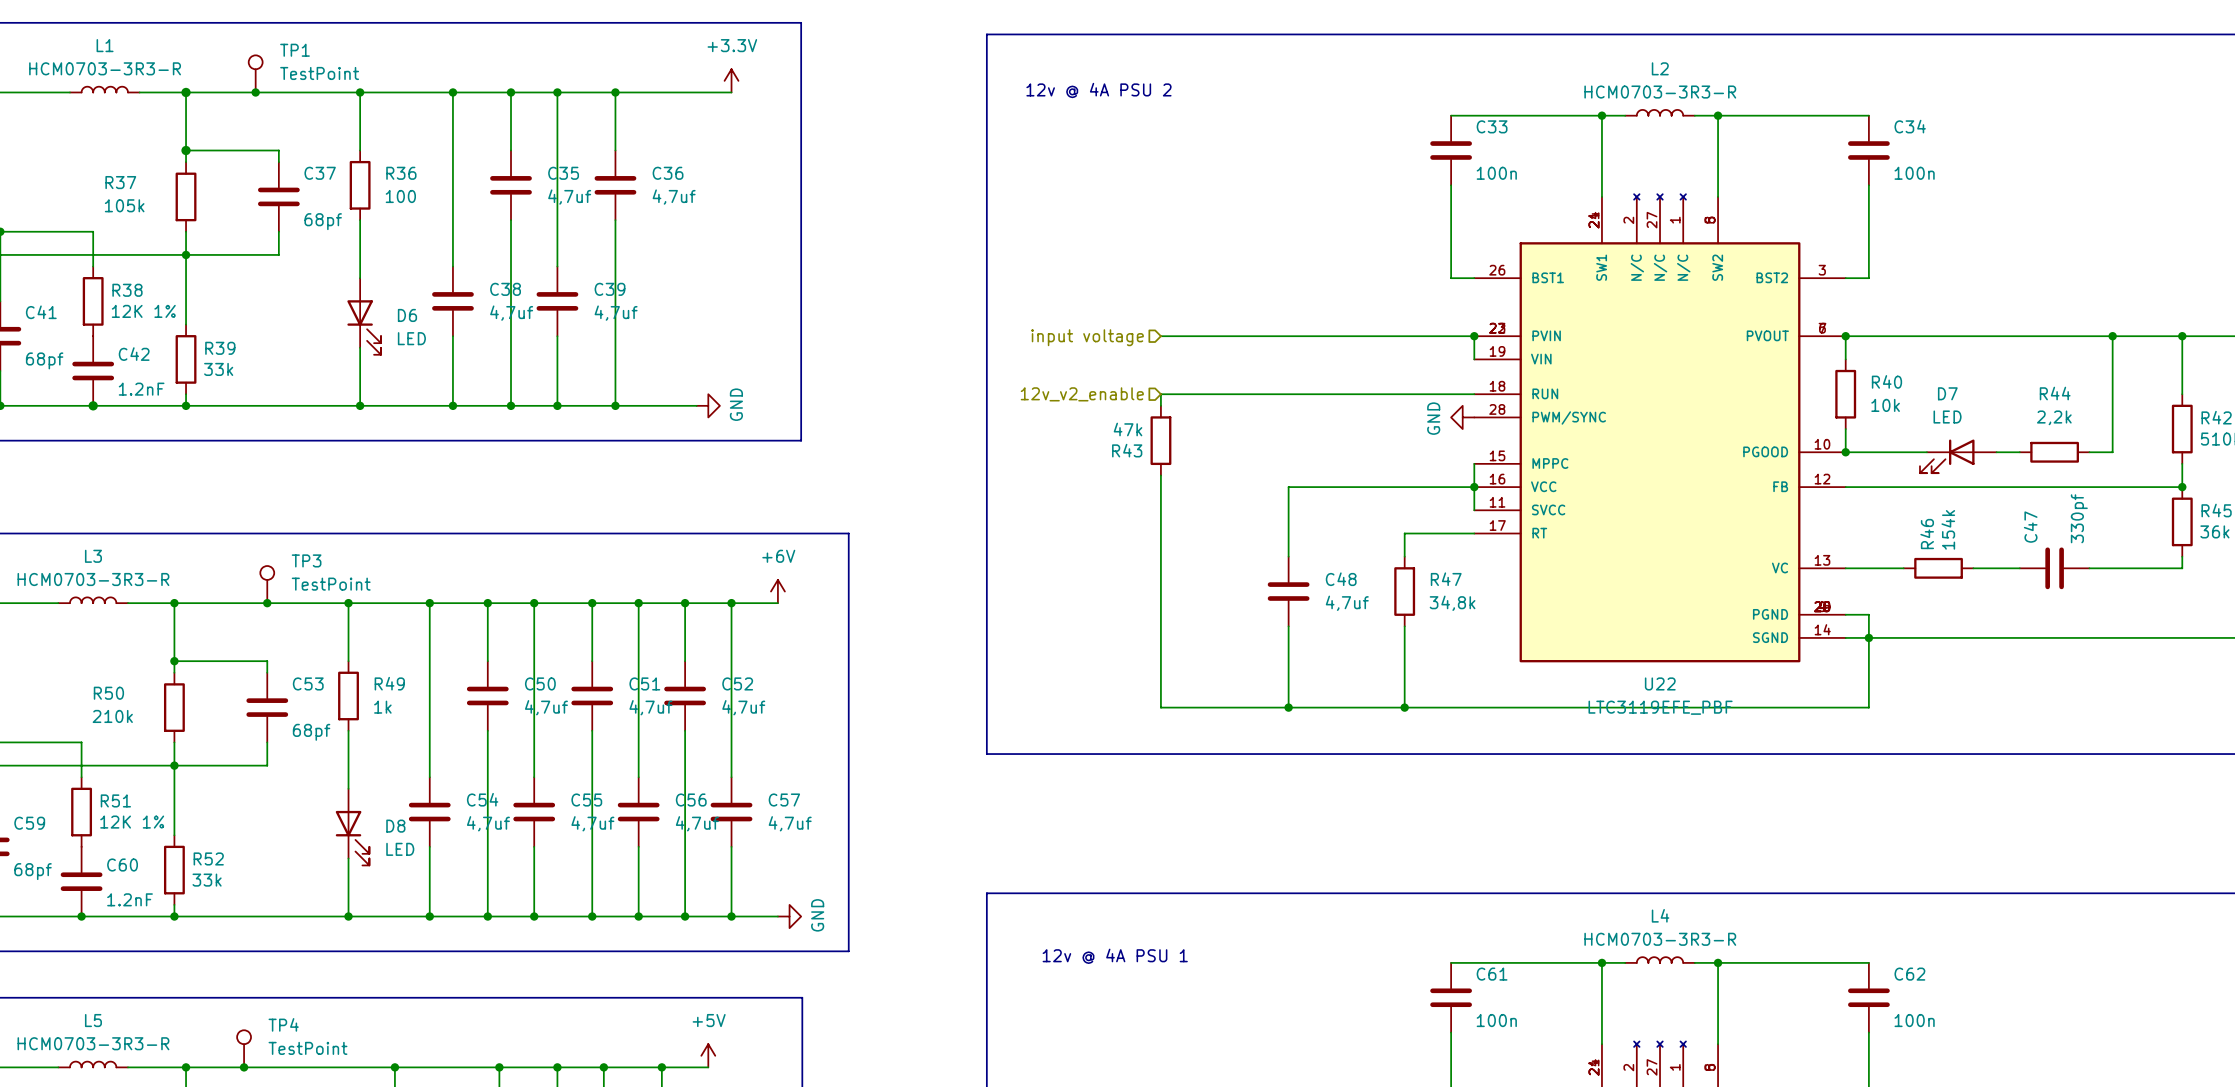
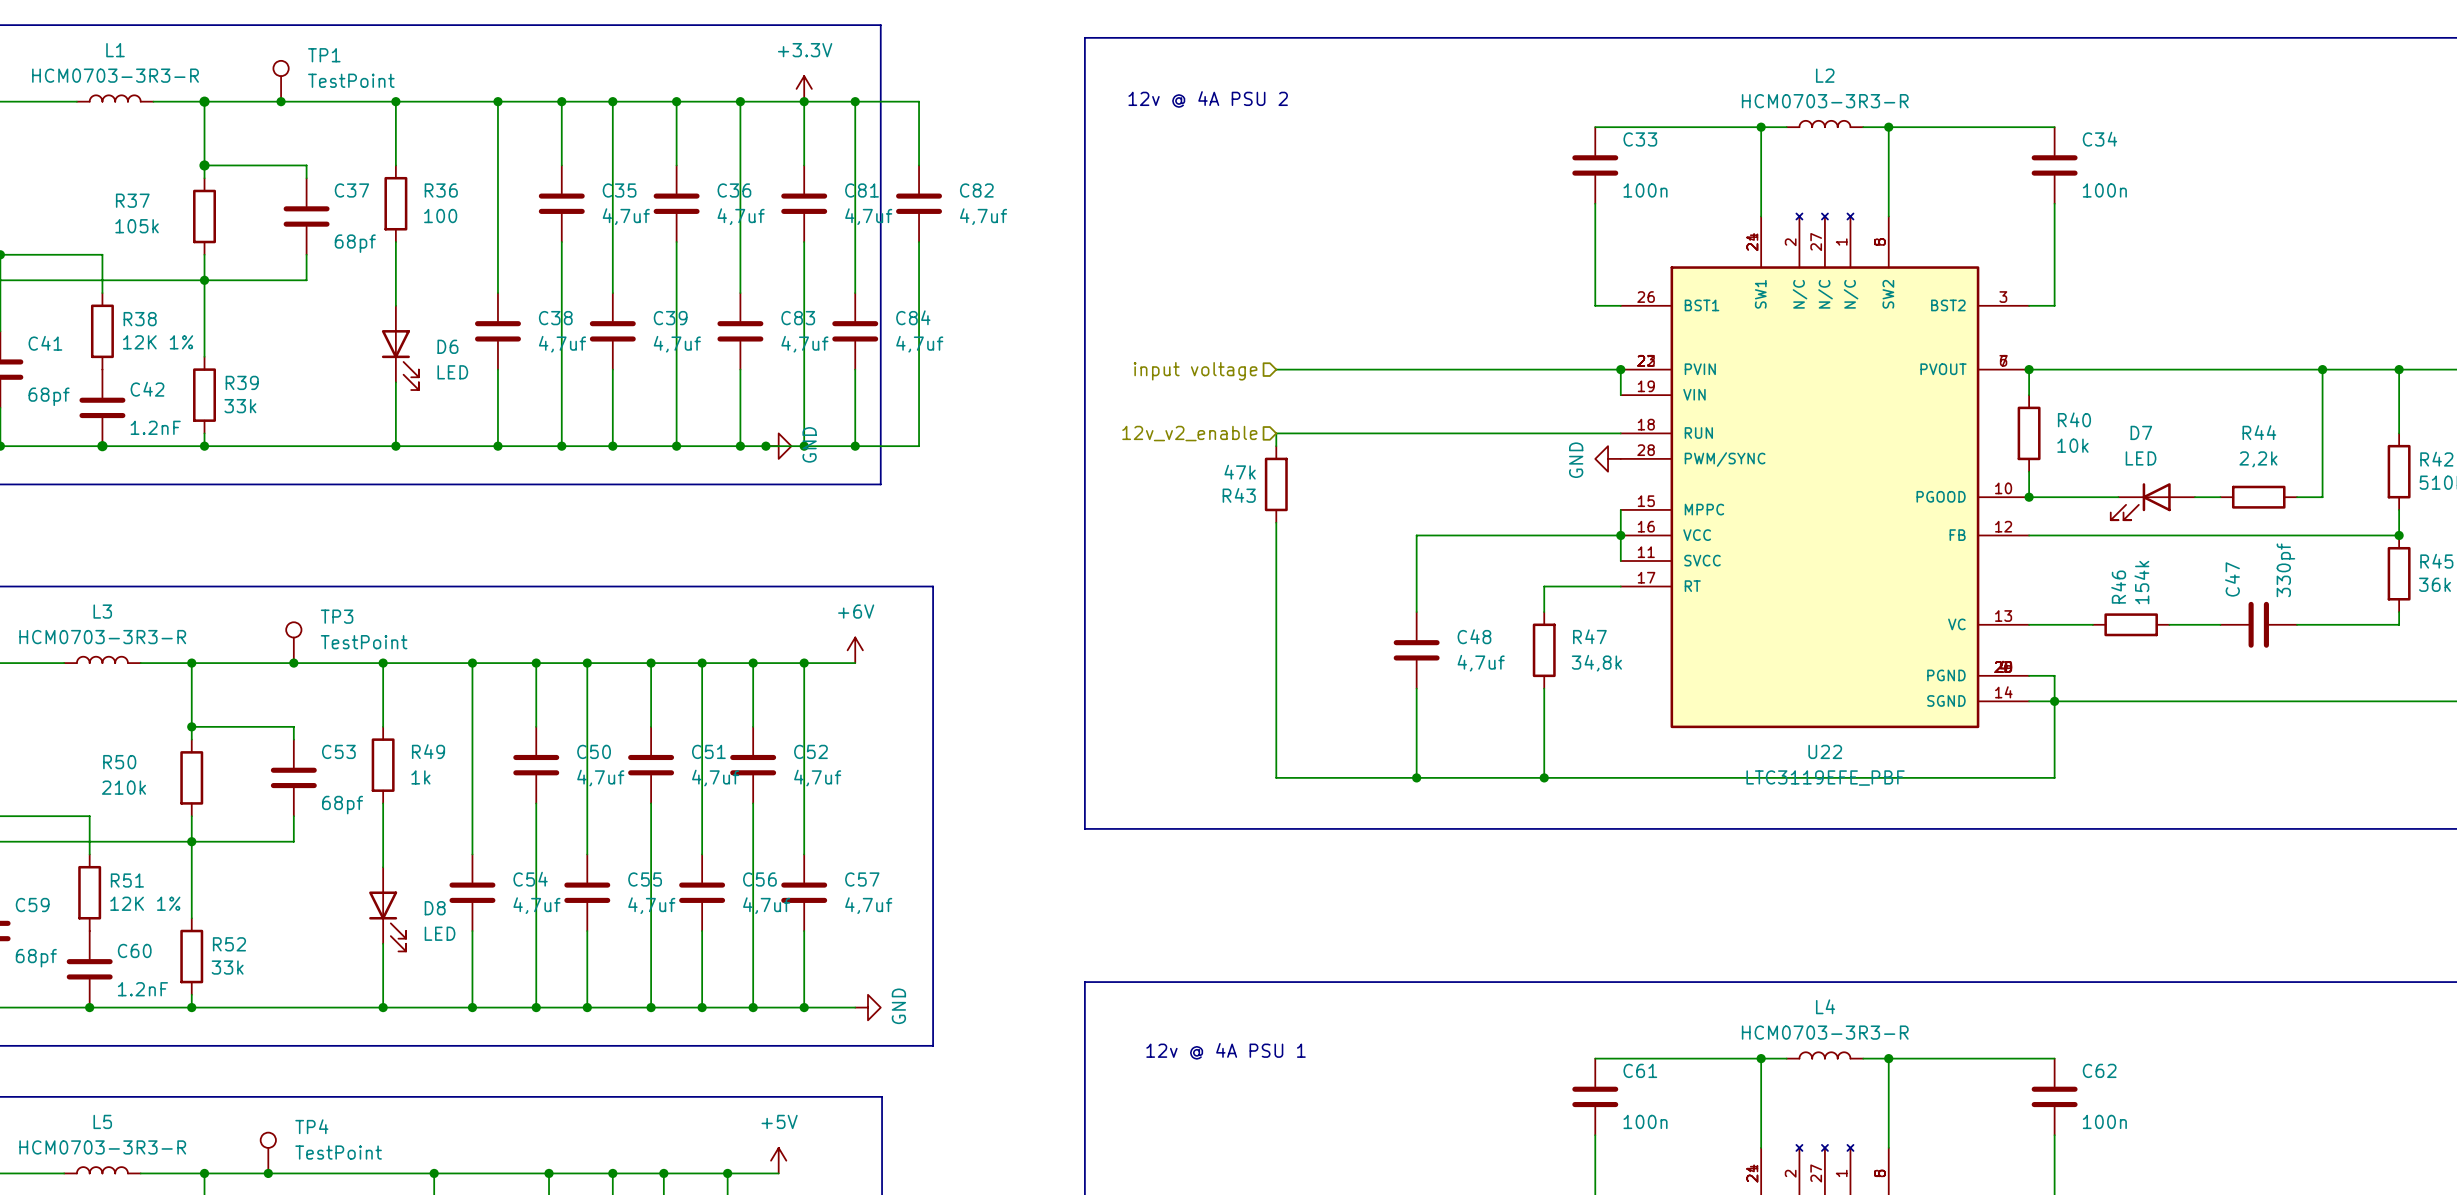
wire: none -> (740, 101) (740, 293)
junction: none -> (740, 101)
junction: none -> (804, 101)
wire: none -> (855, 101) (855, 293)
junction: none -> (855, 101)
wire: none -> (804, 165) (804, 101) (919, 101) (919, 165)
C81: none -> 4,7uf (804, 203)
C82: none -> 4,7uf (919, 203)
wire: none -> (804, 242) (804, 446)
wire: none -> (919, 242) (919, 446) (765, 446)
C83: none -> 4,7uf (740, 331)
C84: none -> 4,7uf (855, 331)
wire: none -> (740, 369) (740, 446)
wire: none -> (855, 369) (855, 446)
junction: none -> (740, 446)
junction: none -> (765, 446)
junction: none -> (804, 446)
junction: none -> (855, 446)

